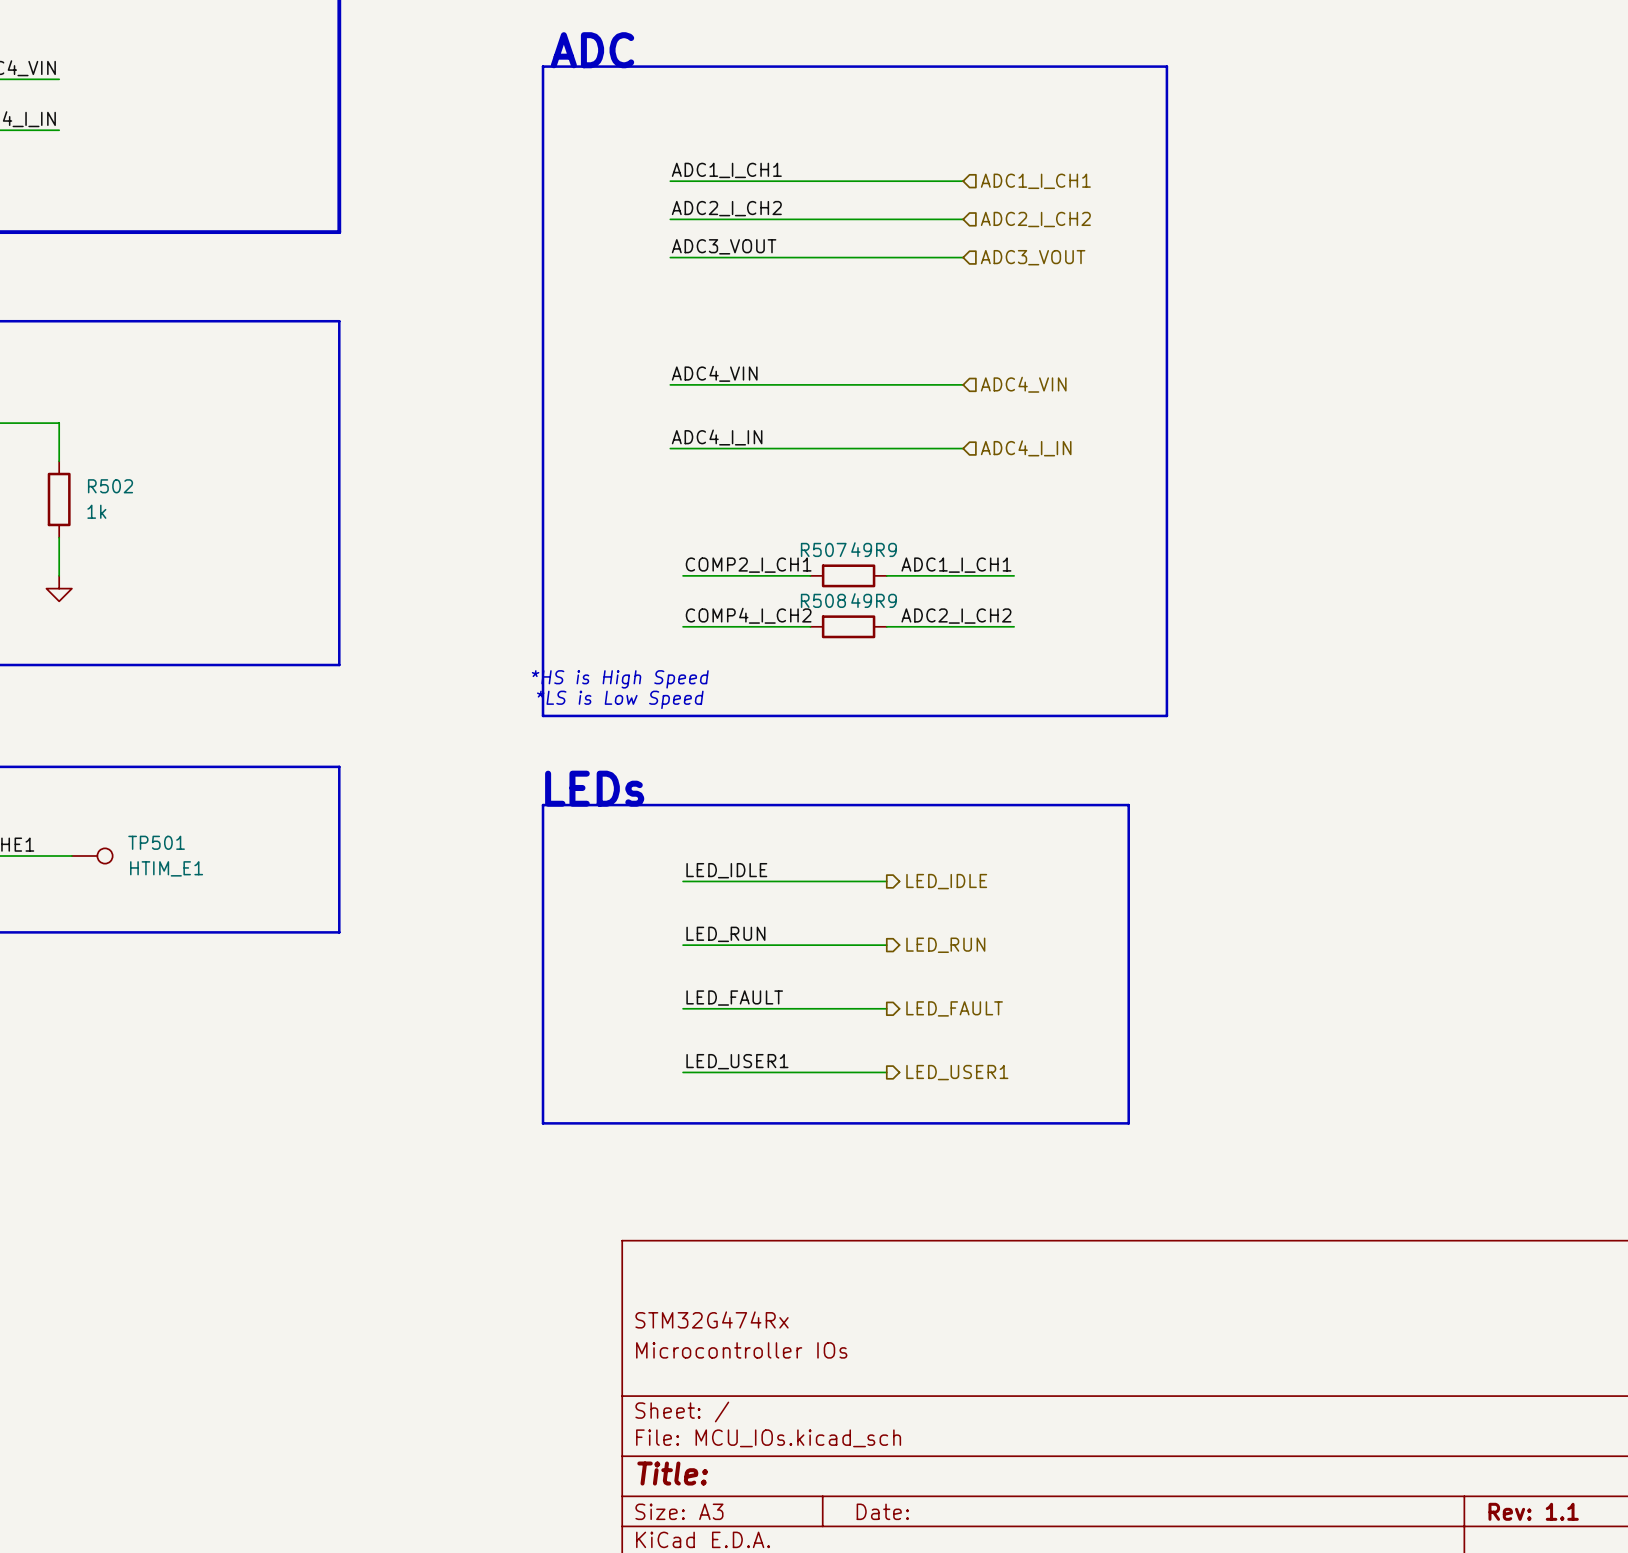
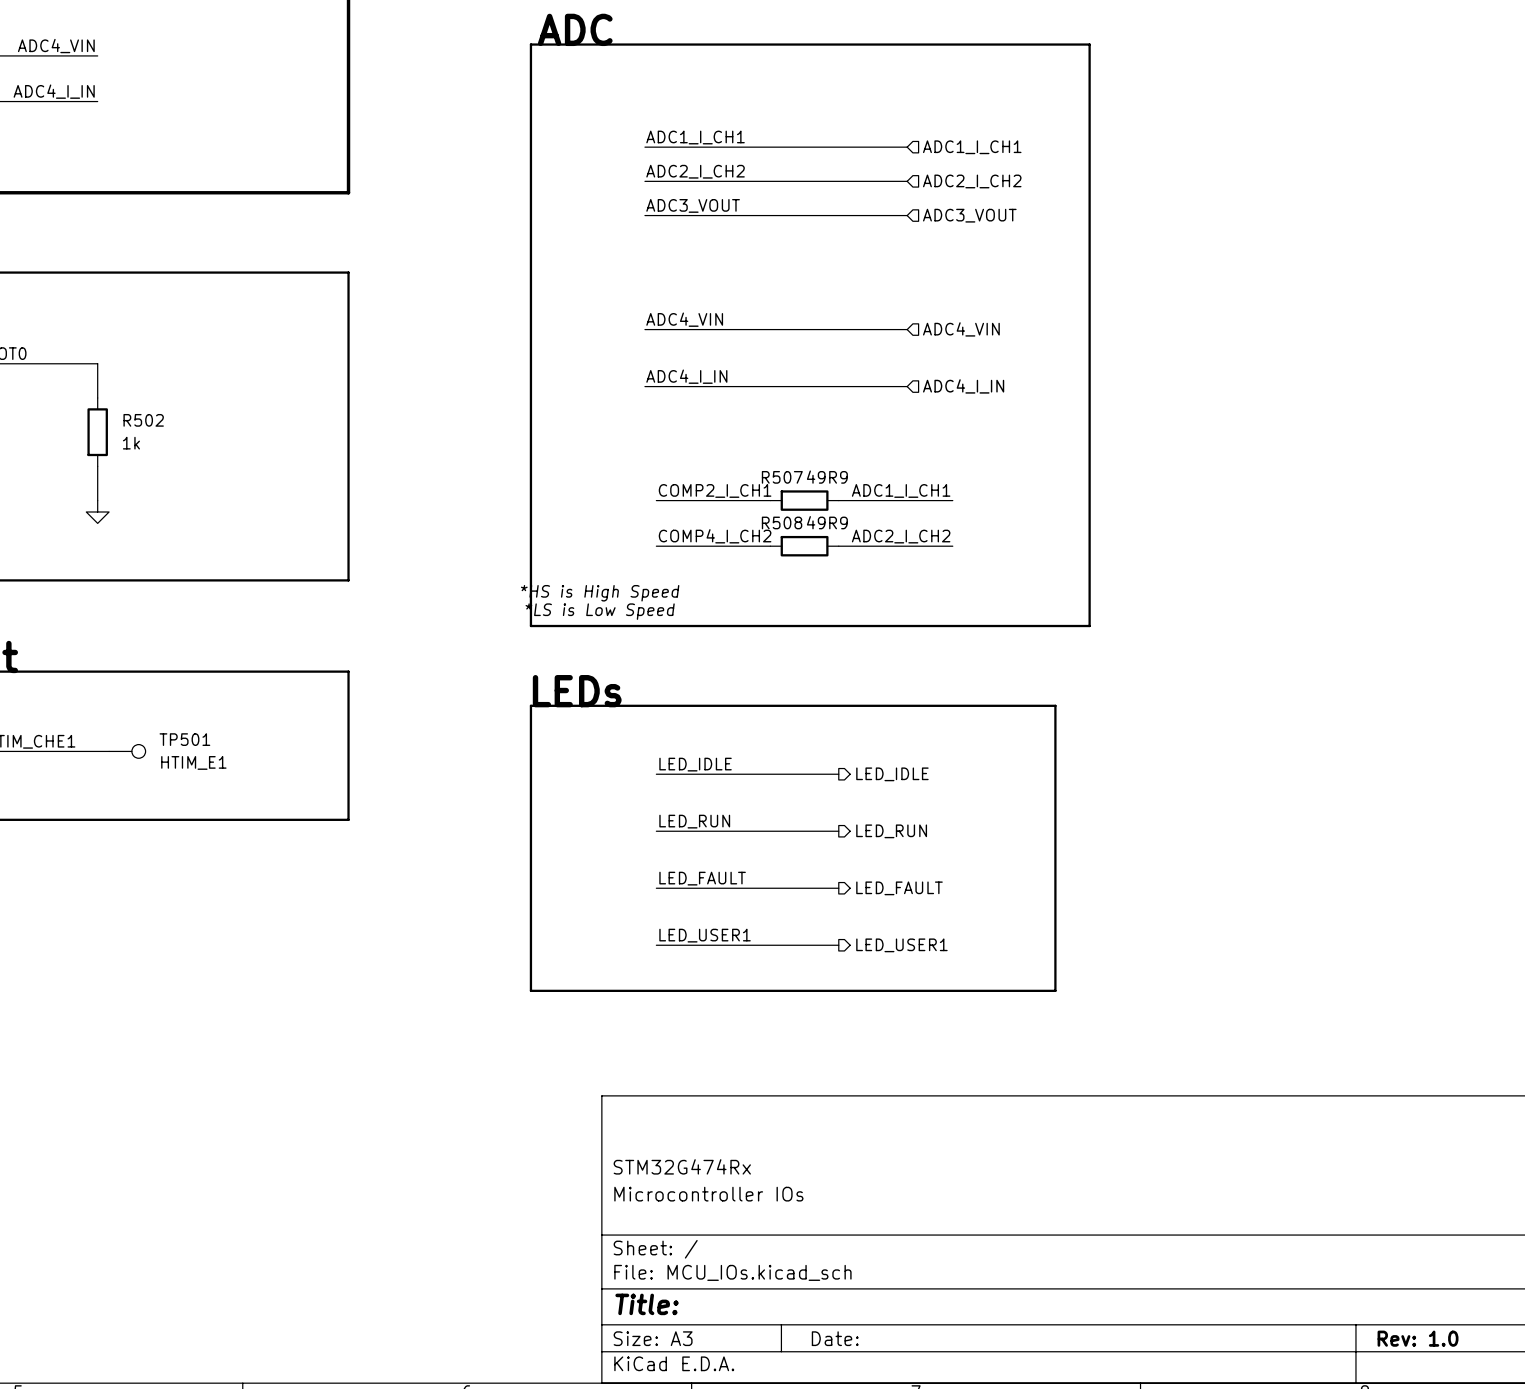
title block: Rev: 1.1 (1533, 1511) -> Rev: 1.0 (1418, 1338)

